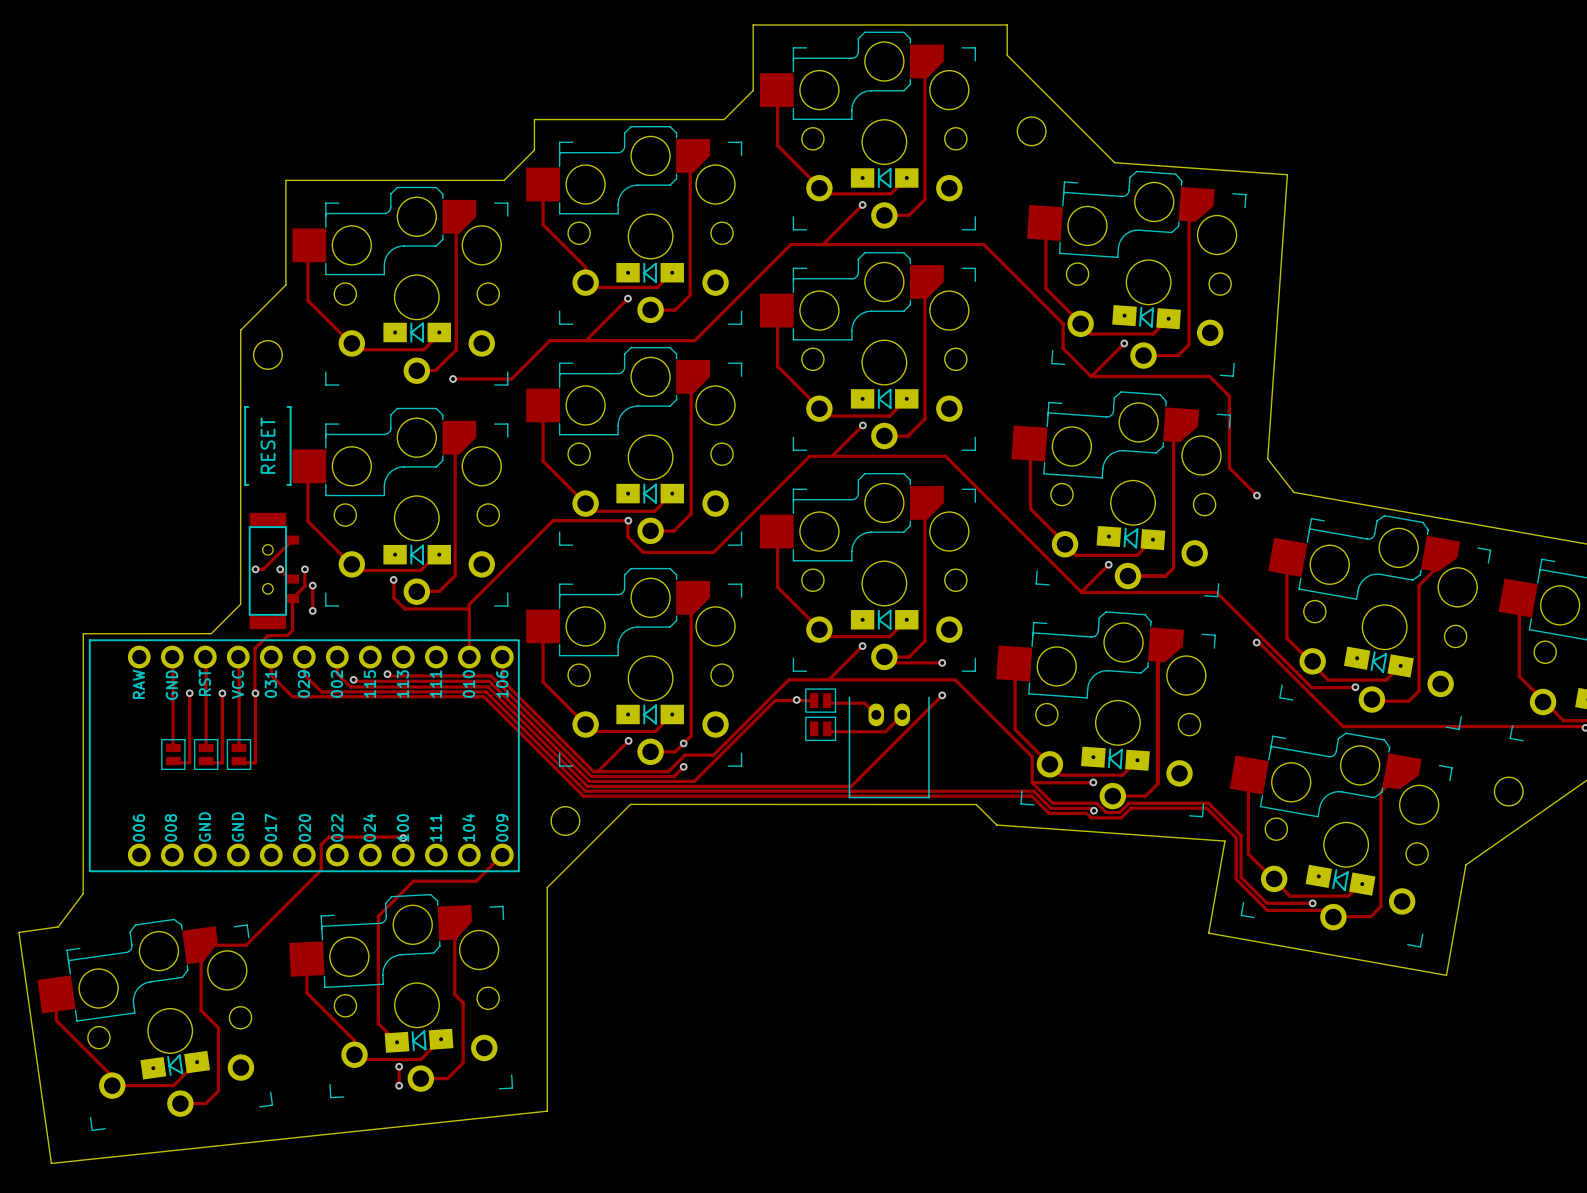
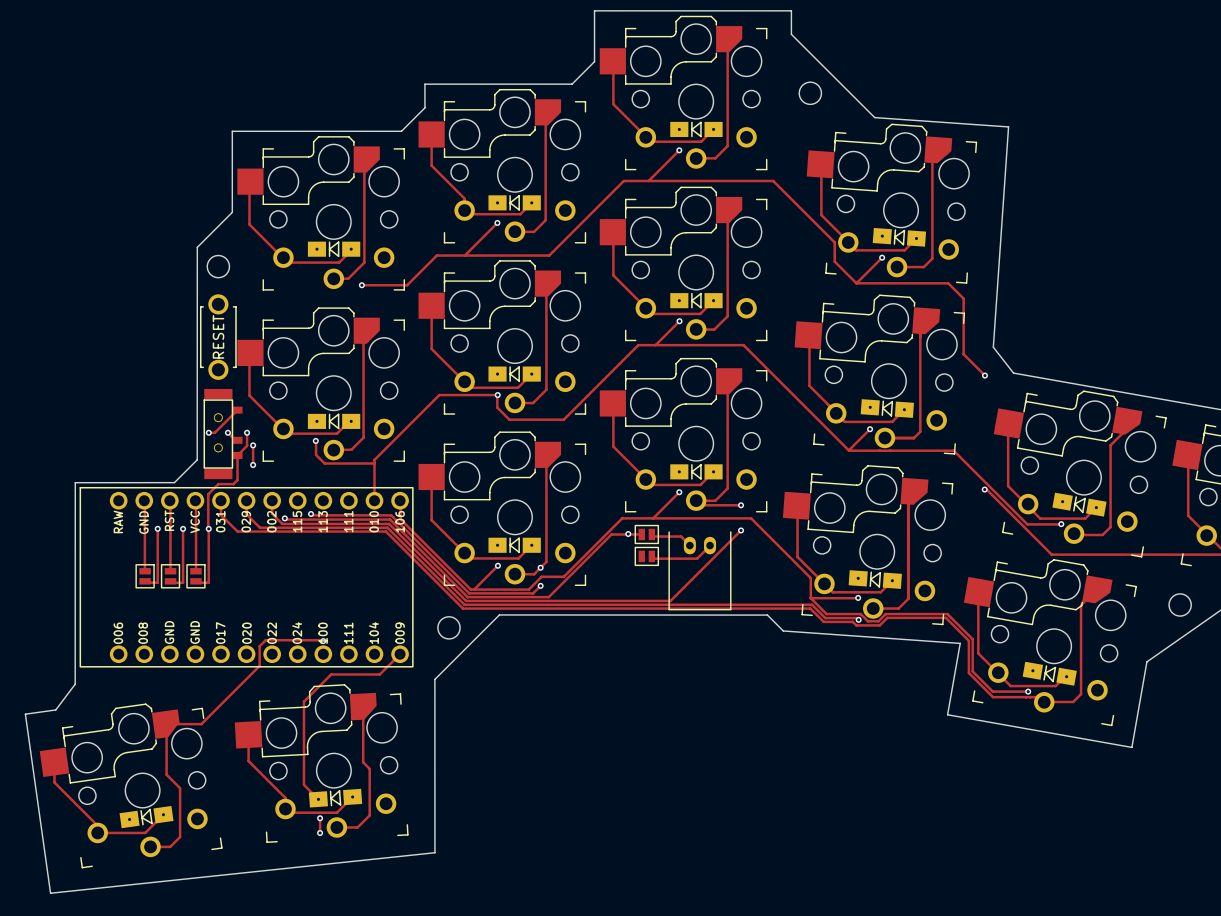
drawing: [244, 405, 292, 486] -> none
part: none -> (218, 337)

